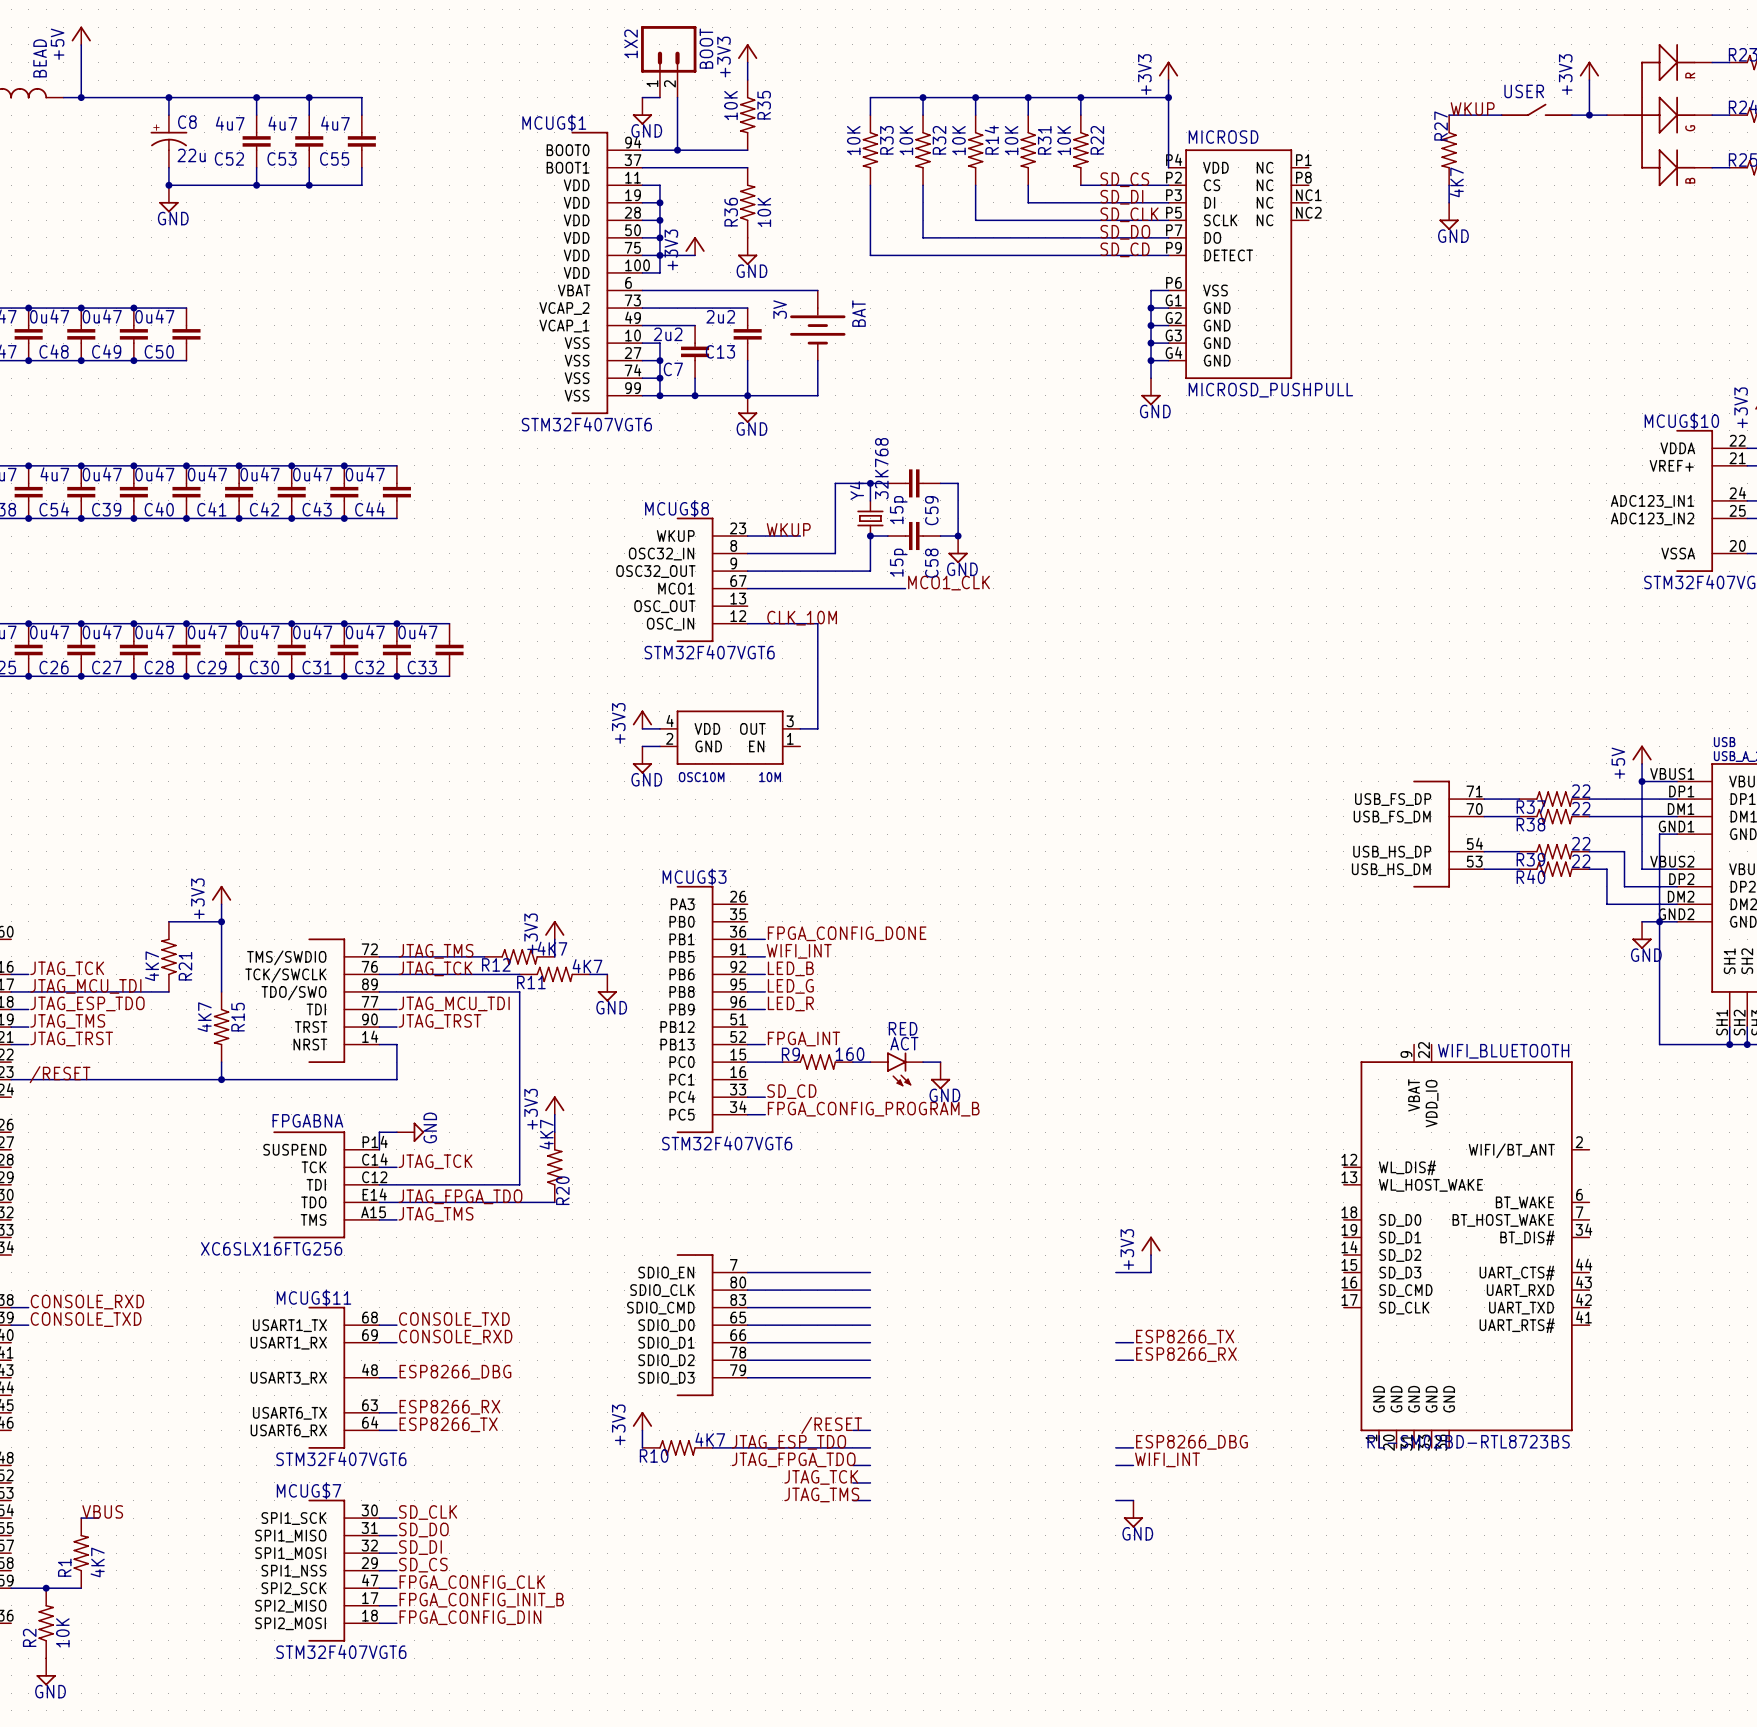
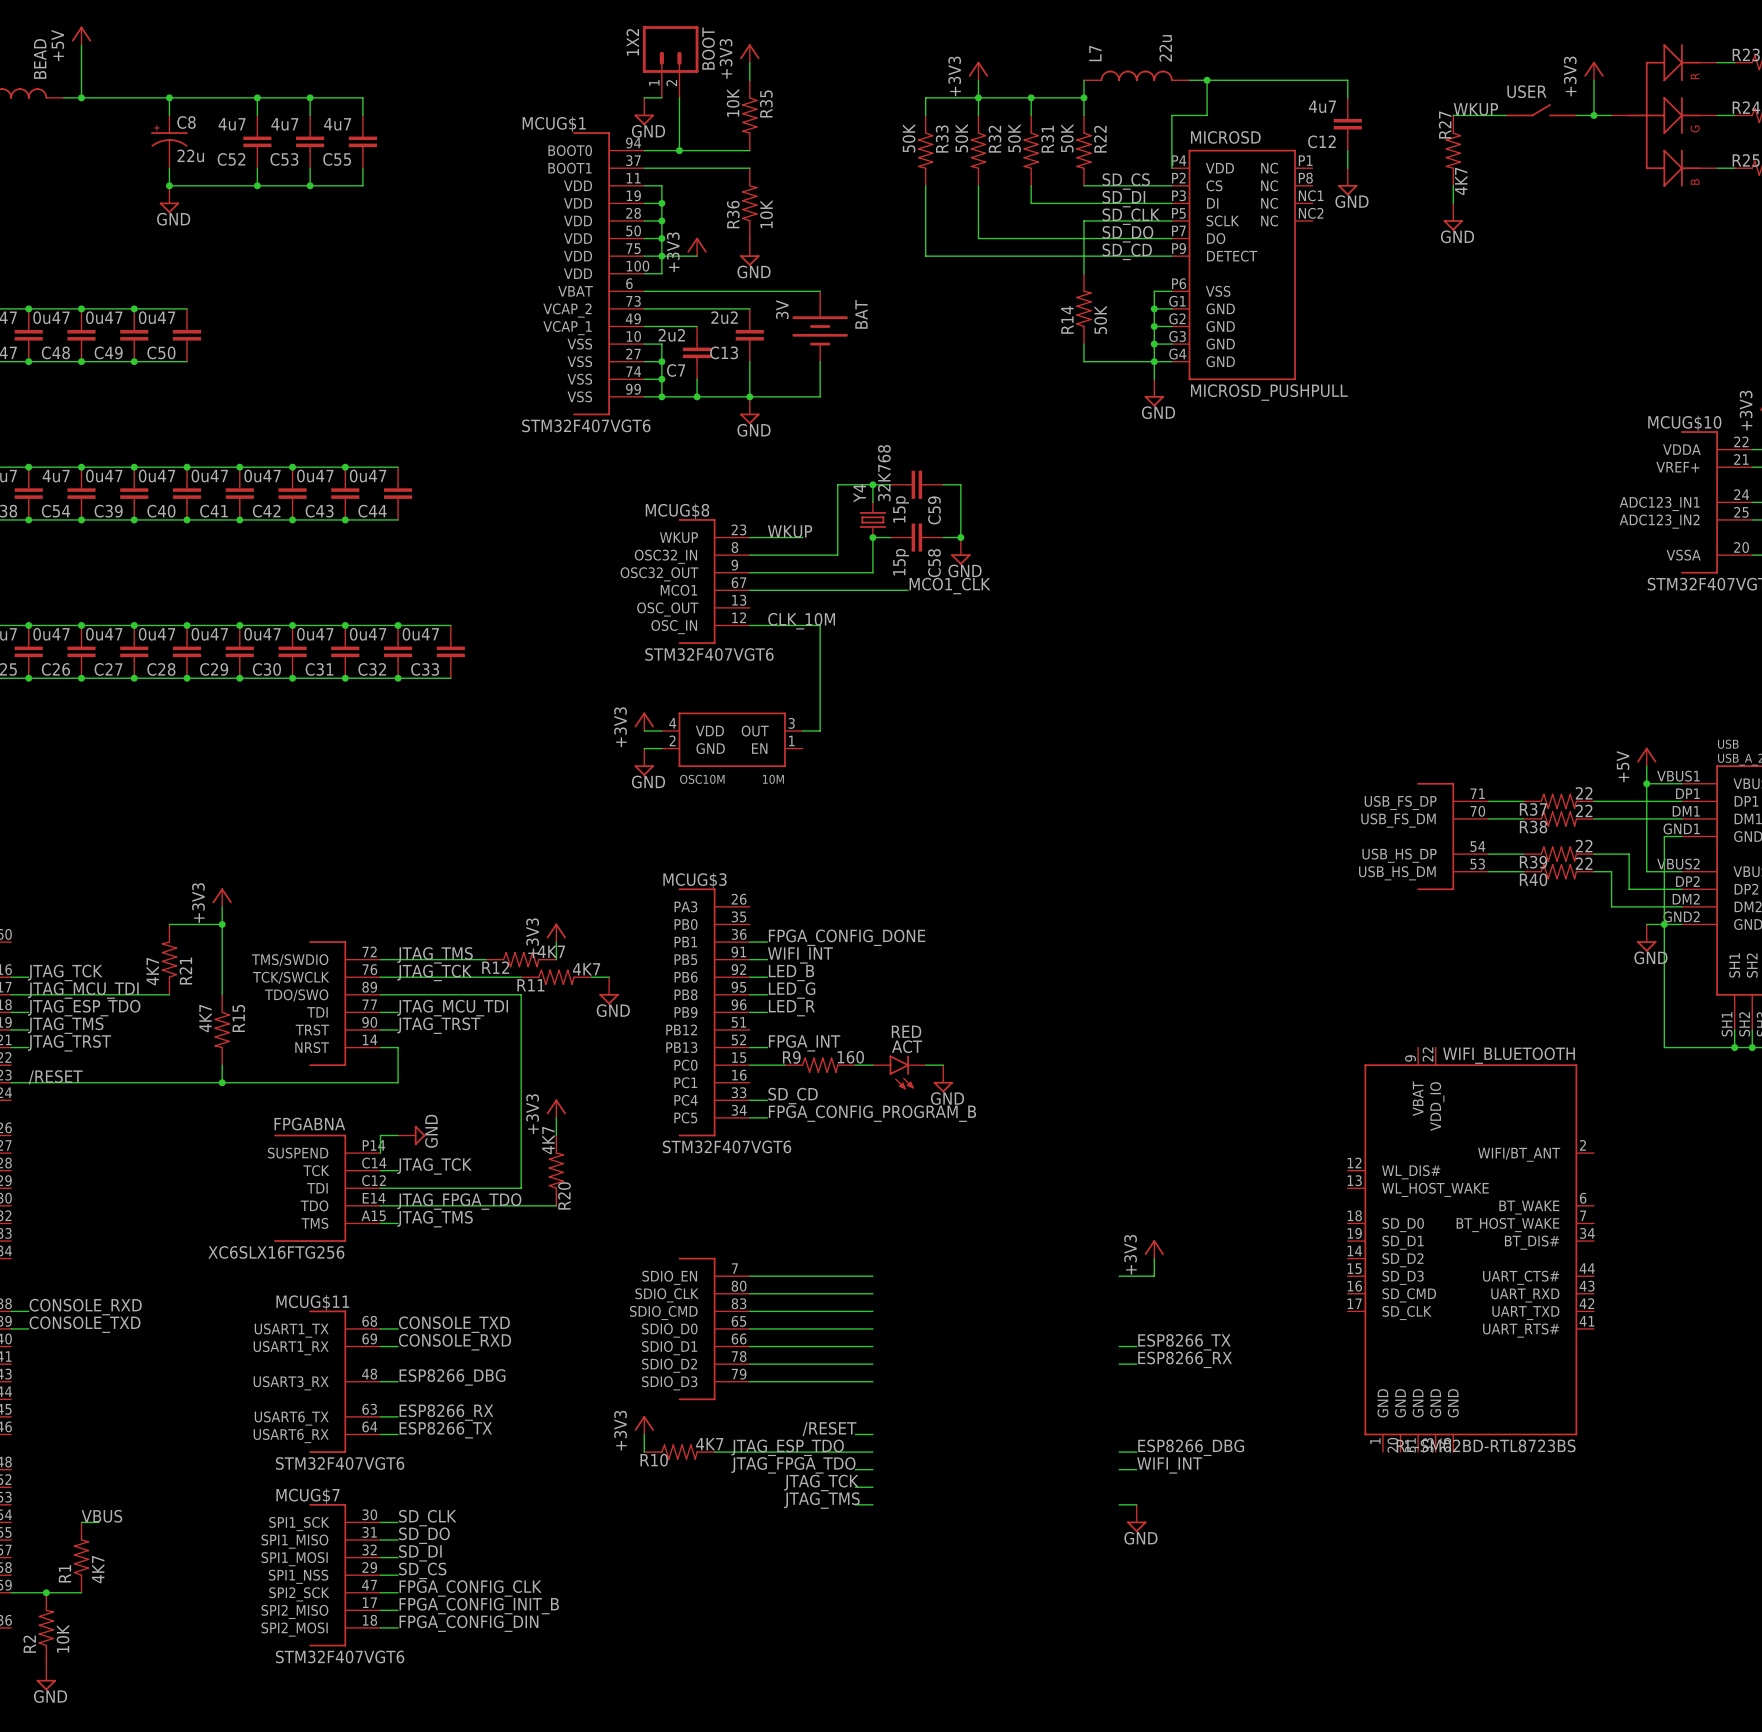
power symbol: none -> +3V3 (978, 71)
power symbol: +3V3 (1168, 70) -> none
L7: none -> 22u (1136, 75)
wire: none -> (978, 80) (978, 97)
wire: (1168, 80) (1168, 115) -> (1207, 80) (1207, 115) (1171, 115)
wire: none -> (1189, 80) (1347, 80) (1347, 97)
wire: (923, 97) (870, 97) (870, 115) -> none
junction: (923, 97) -> none
wire: (1080, 97) (1168, 97) -> (1083, 97) (1083, 80)
junction position: (1168, 97) -> (1207, 80)
C12: none -> 4u7 (1347, 124)
R32 value: 10K (906, 140) -> 50K (908, 138)
R32 name: R32 (939, 140) -> R33 (942, 139)
R14 value: 10K (958, 140) -> 50K (961, 138)
R14 name: R14 (991, 140) -> R32 (994, 139)
R31 value: 10K (1011, 140) -> 50K (1014, 138)
R22 value: 10K (1064, 140) -> 50K (1067, 138)
R33: 10K (870, 150) -> none
wire: none -> (1347, 150) (1347, 168)
power symbol: none -> GND (1347, 181)
wire: (870, 185) (870, 255) (923, 255) -> (925, 238) (925, 256)
wire: (975, 220) (1080, 220) -> (1083, 273) (1083, 220)
wire: (923, 237) (975, 237) -> (978, 220) (978, 238)
R14: none -> 50K (1083, 308)
wire: none -> (1083, 344) (1083, 361) (1154, 361)

